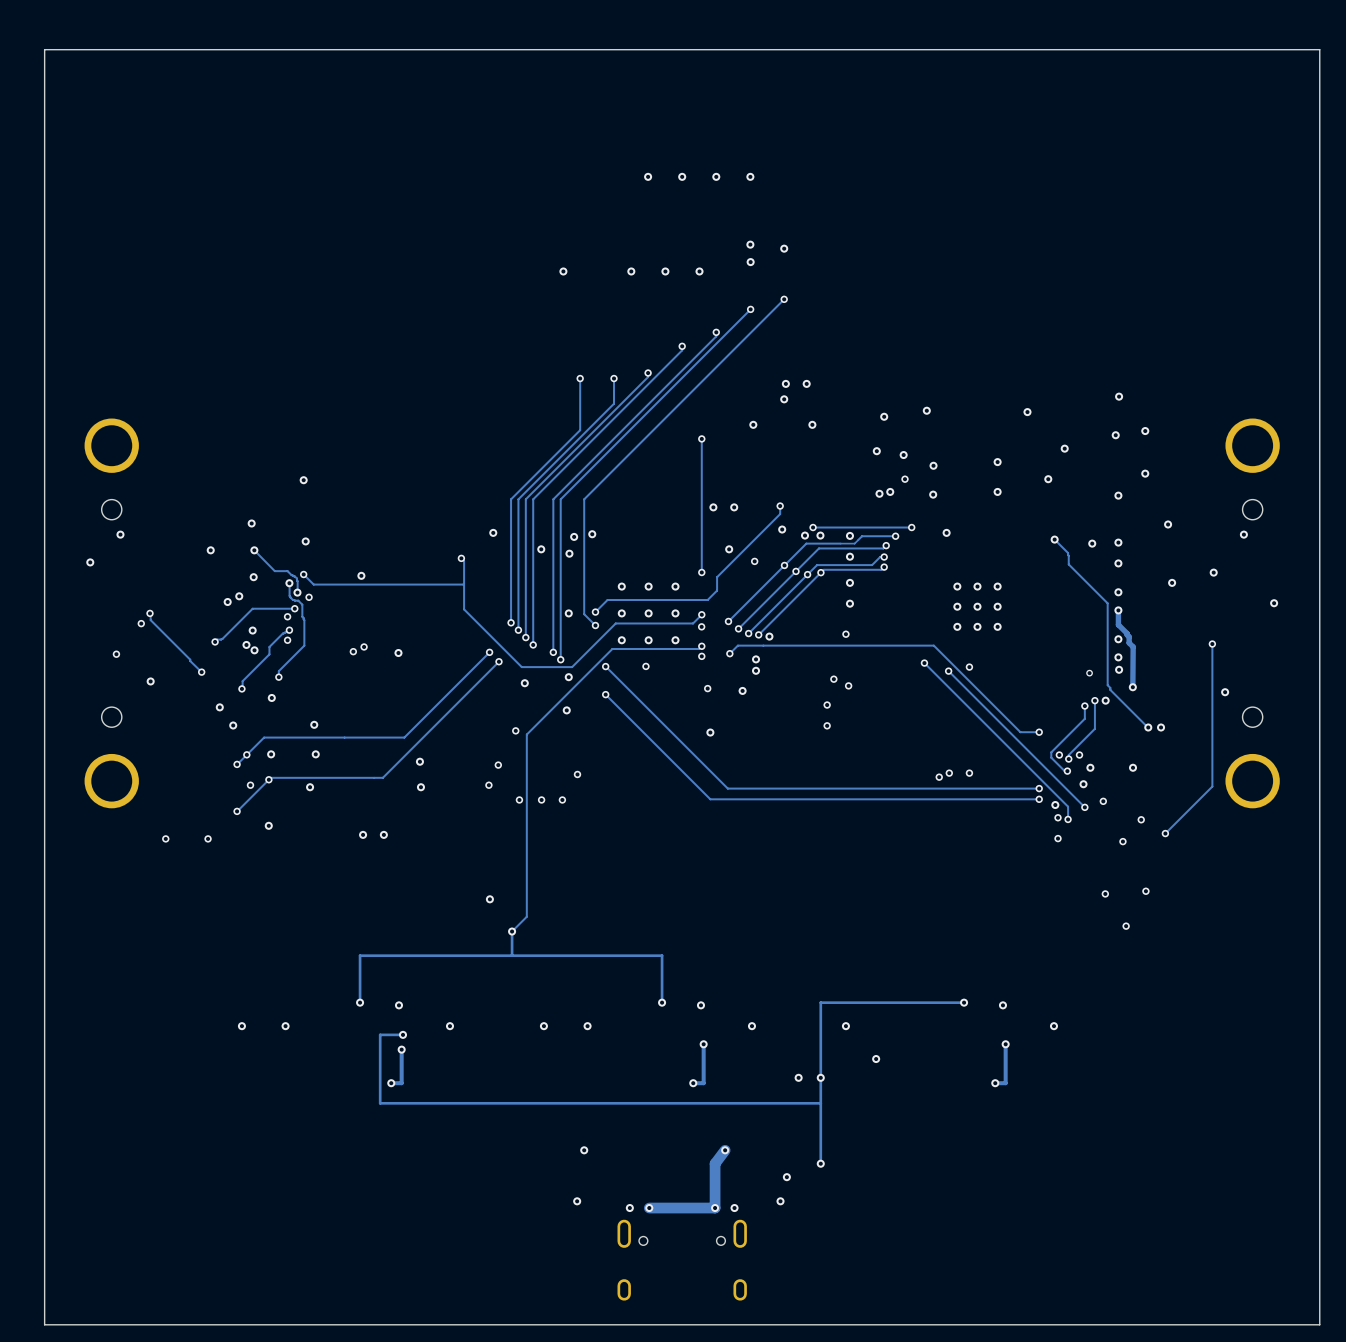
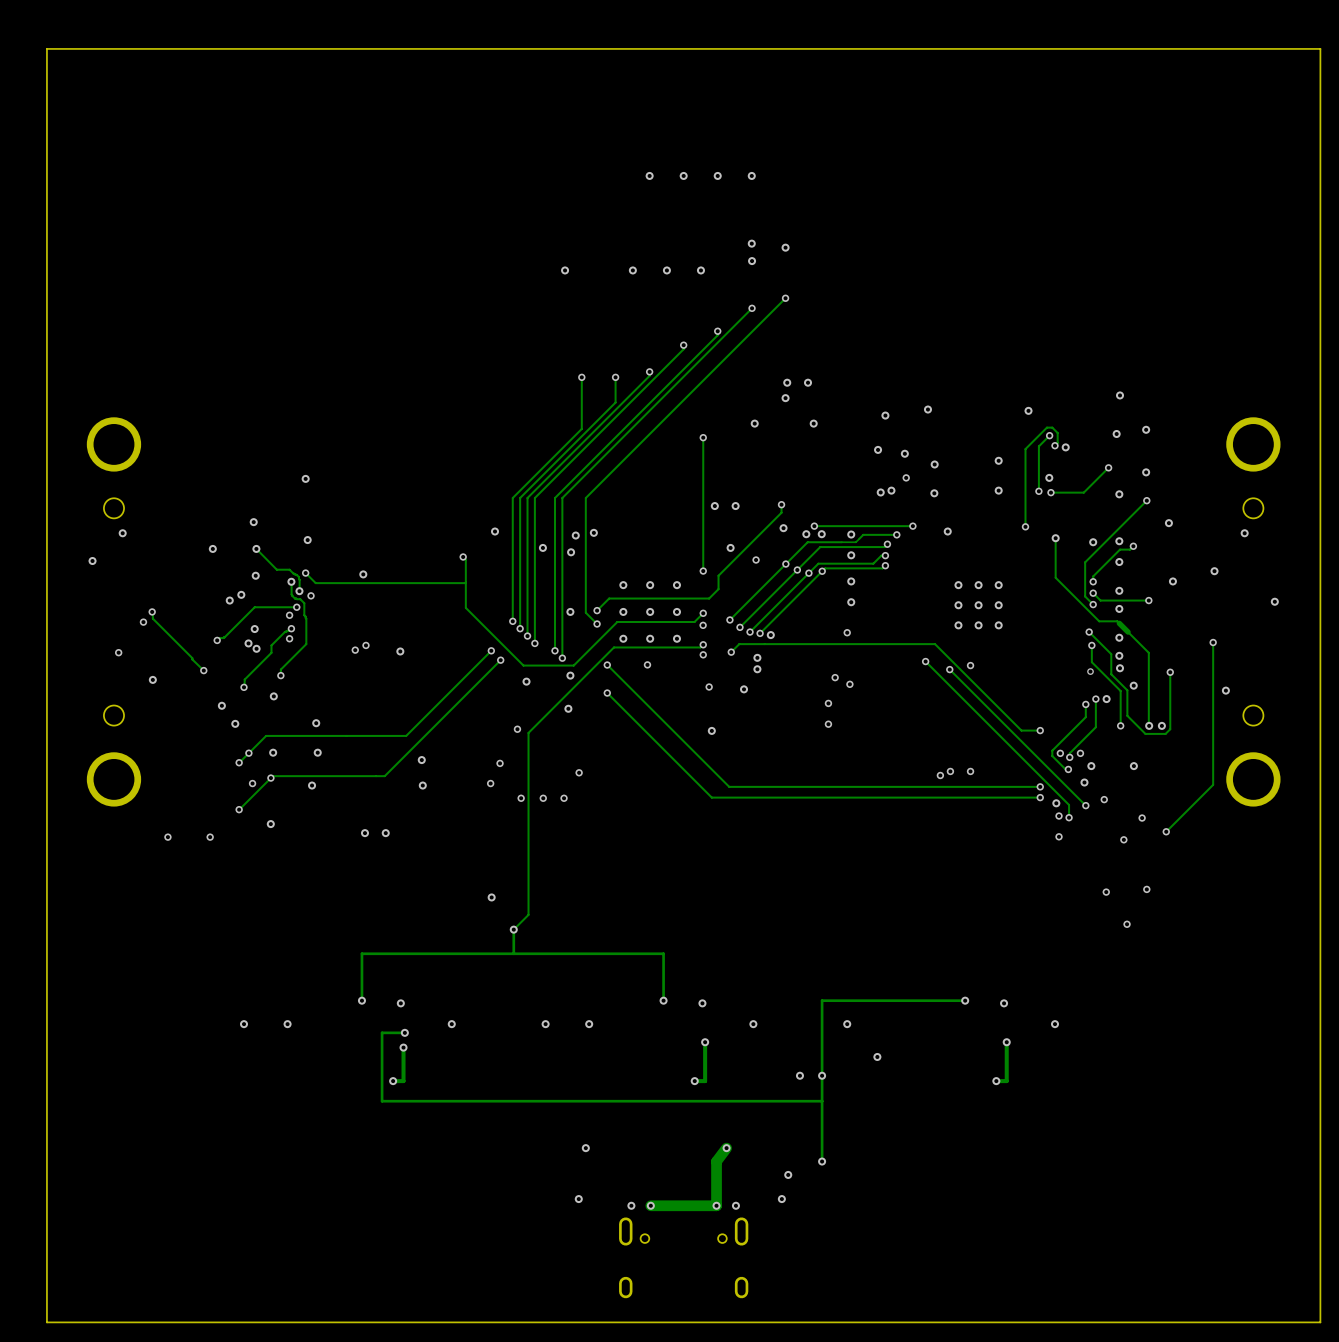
track: none -> (1049, 435) (1038, 446) (1038, 491)
via: none -> (1049, 435)
track: none -> (1054, 445) (1057, 443) (1057, 432) (1052, 427) (1046, 427) (1025, 449) (1025, 526)
via: none -> (1054, 445)
track: none -> (1108, 467) (1083, 492) (1050, 492)
via: none -> (1108, 467)
via: none -> (1038, 491)
via: none -> (1050, 492)
track: none -> (1146, 500) (1085, 562) (1085, 596) (1093, 604)
via: none -> (1146, 500)
via: none -> (1025, 526)
track: (1054, 539) (1068, 553) (1068, 564) (1107, 603) (1107, 685) (1148, 727) -> none
track: none -> (1133, 546) (1130, 549) (1120, 549) (1093, 576) (1093, 581)
via: none -> (1133, 546)
via: none -> (1093, 581)
track: none -> (1093, 593) (1100, 600) (1148, 600)
via: none -> (1093, 593)
via: none -> (1148, 600)
via: none -> (1093, 604)
track: (1118, 610) (1118, 624) -> (1055, 538) (1055, 577) (1099, 621) (1117, 621) (1119, 623)
track: none -> (1089, 632) (1111, 654) (1111, 674) (1127, 690) (1127, 715) (1145, 733) (1165, 733) (1170, 729) (1170, 672)
via: none -> (1089, 632)
track: (1127, 633) (1129, 642) (1133, 646) (1132, 687) -> (1128, 632) (1148, 652) (1148, 725)
track: none -> (1091, 645) (1091, 662) (1120, 691) (1120, 725)
via: none -> (1091, 645)
via: none -> (1170, 672)
via: none -> (1120, 725)

